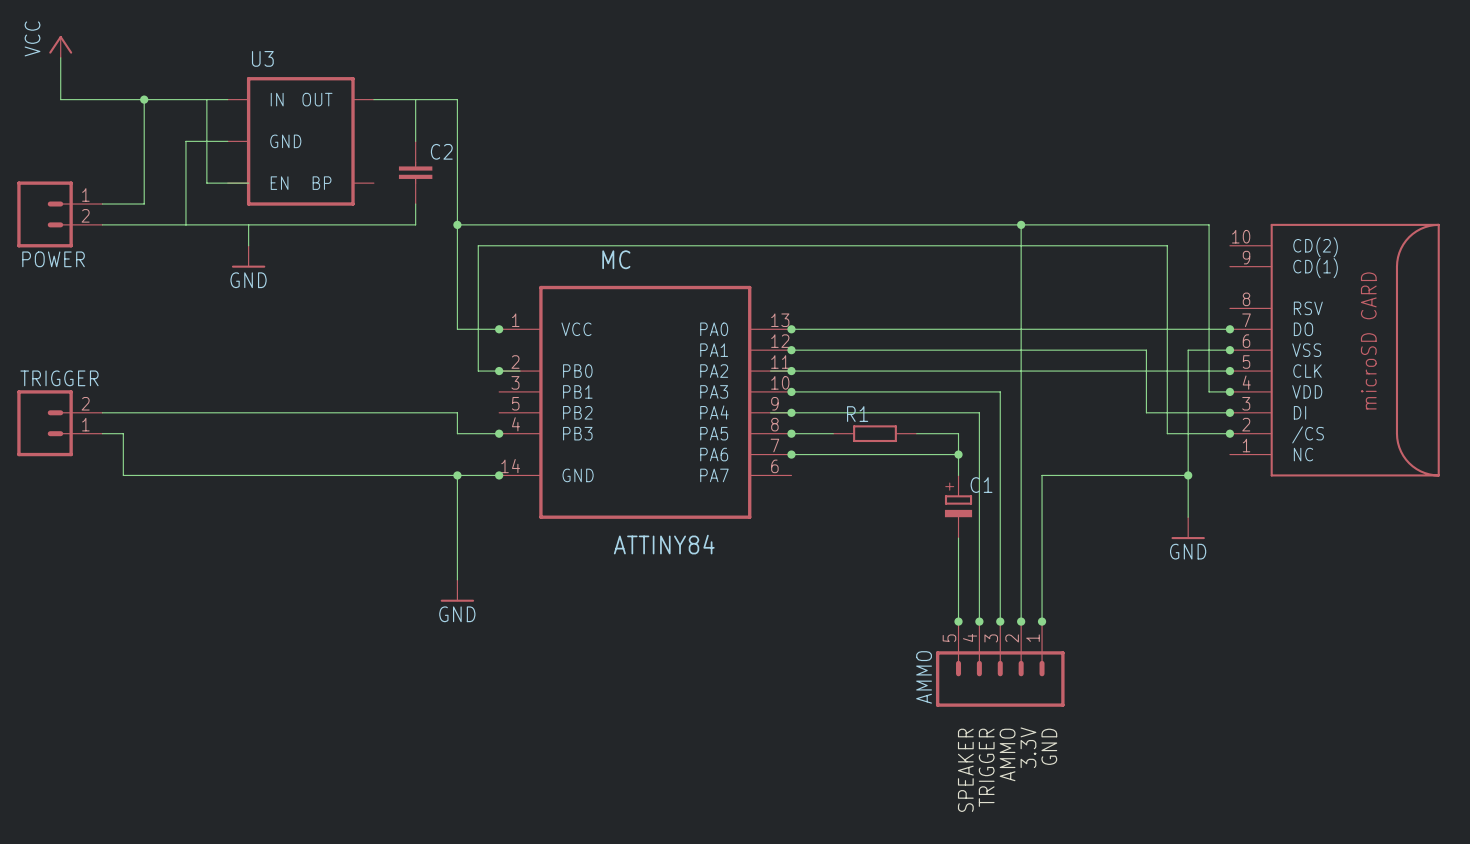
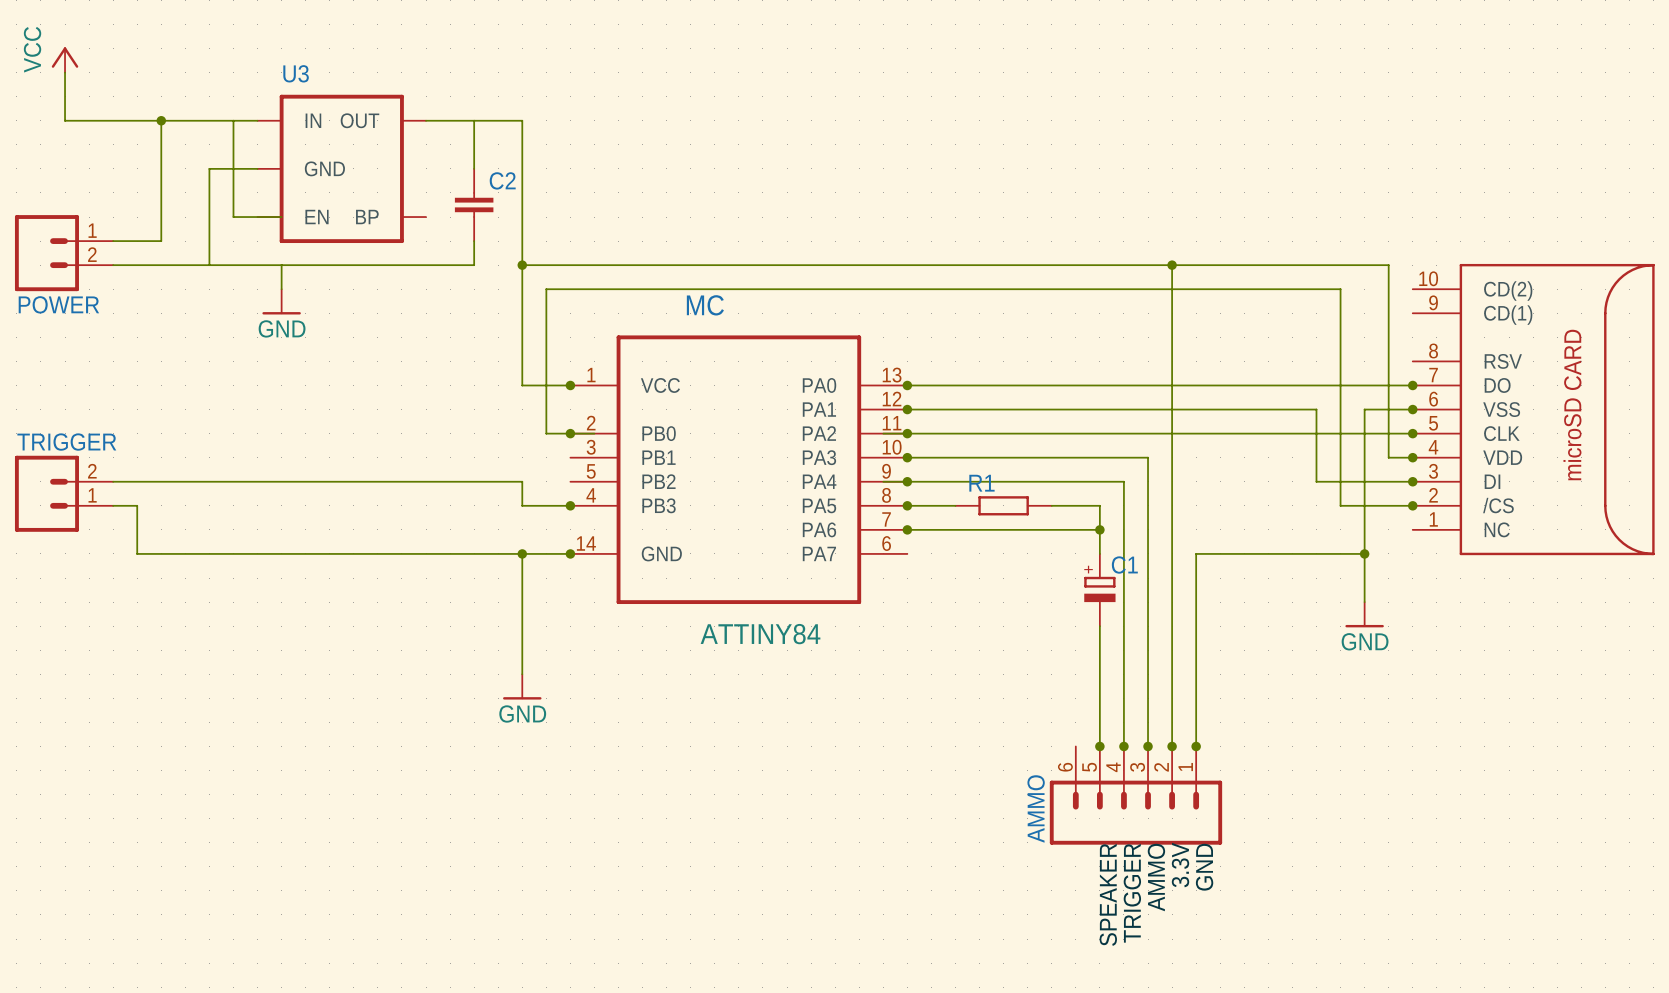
junction: (958, 621) -> none
junction: (979, 621) -> none
junction: (1000, 621) -> none
junction: (1021, 621) -> none
junction: (1042, 621) -> none
junction: none -> (1099, 746)
junction: none -> (1123, 746)
junction: none -> (1148, 746)
junction: none -> (1172, 746)
junction: none -> (1196, 746)
AMMO: (1000, 664) -> none
AMMO: none -> (1135, 795)

